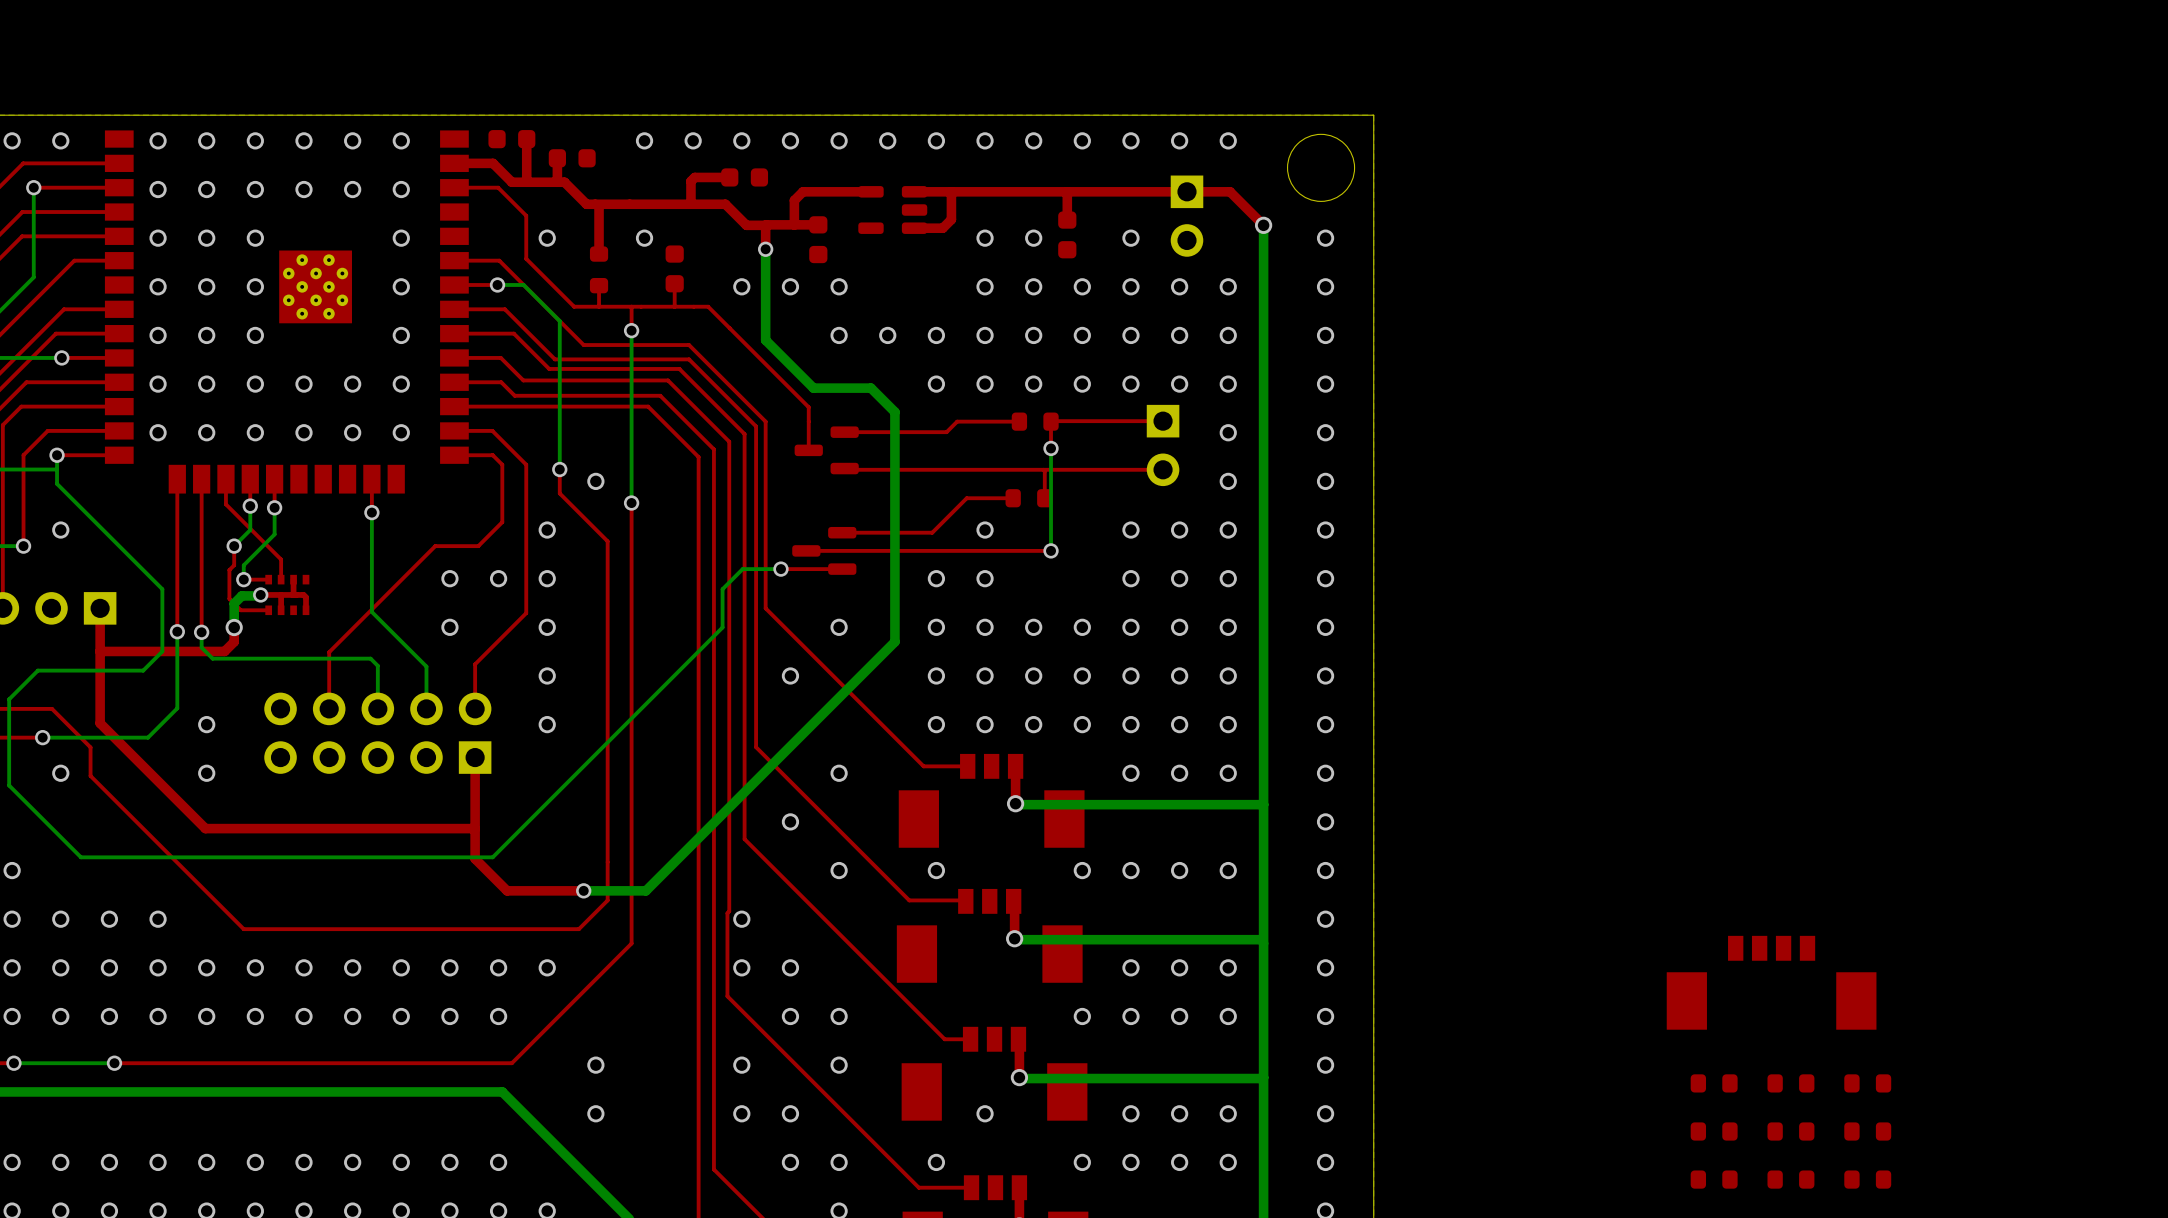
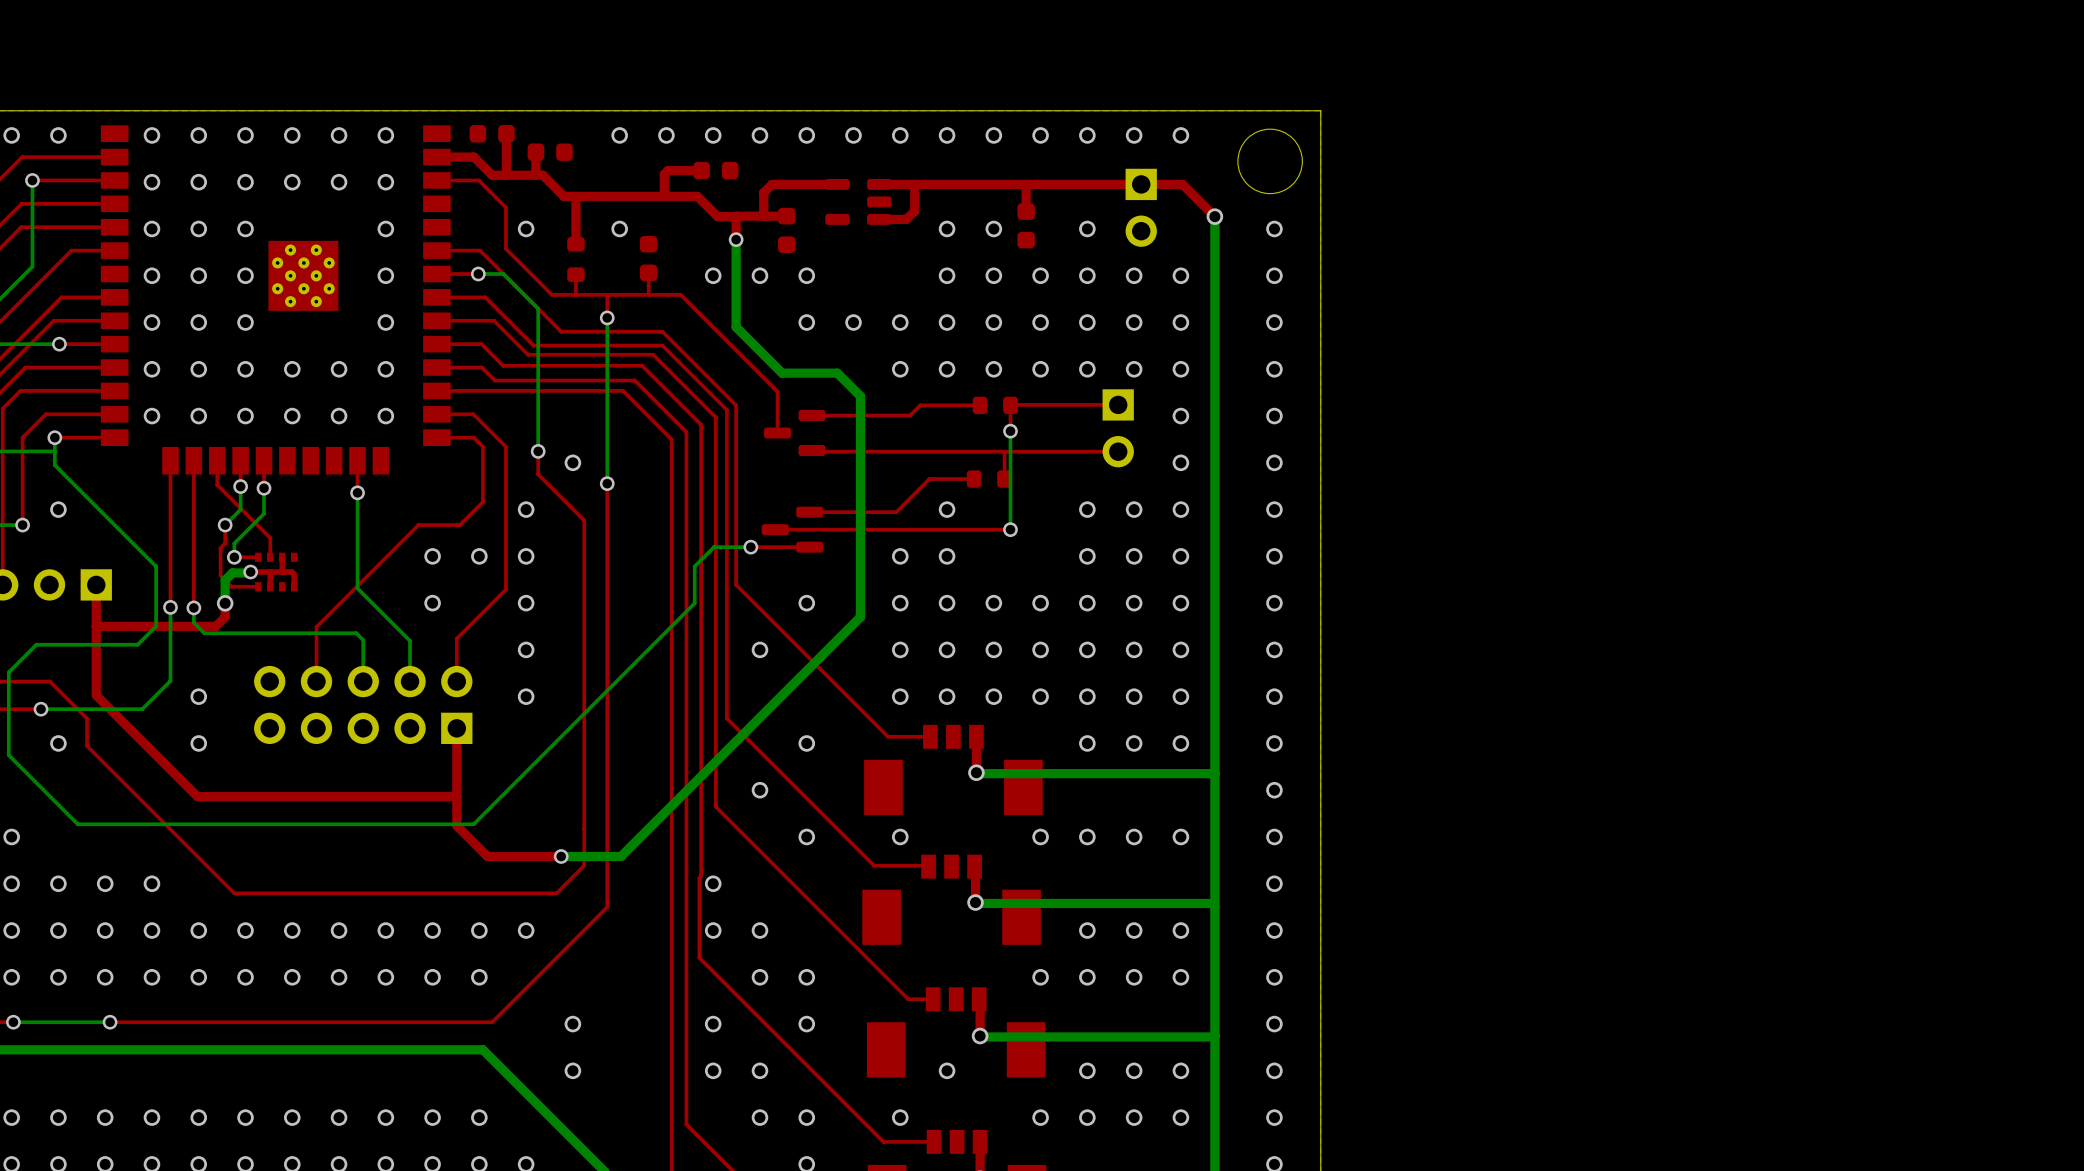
part: (1771, 982) -> none
part: (1714, 1083) -> none
part: (1790, 1083) -> none
part: (1867, 1083) -> none
part: (1714, 1131) -> none
part: (1790, 1131) -> none
part: (1867, 1131) -> none
part: (1714, 1179) -> none
part: (1790, 1179) -> none
part: (1867, 1179) -> none

